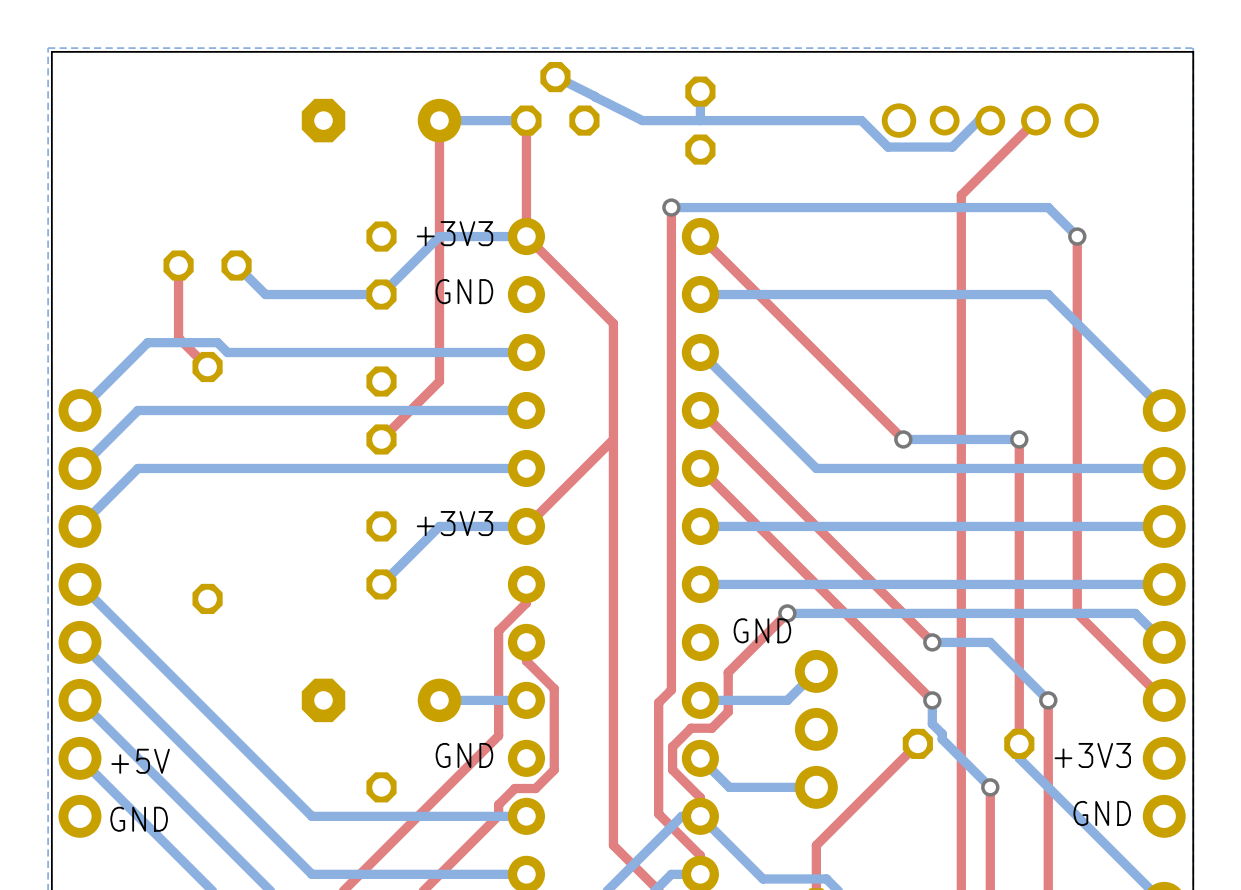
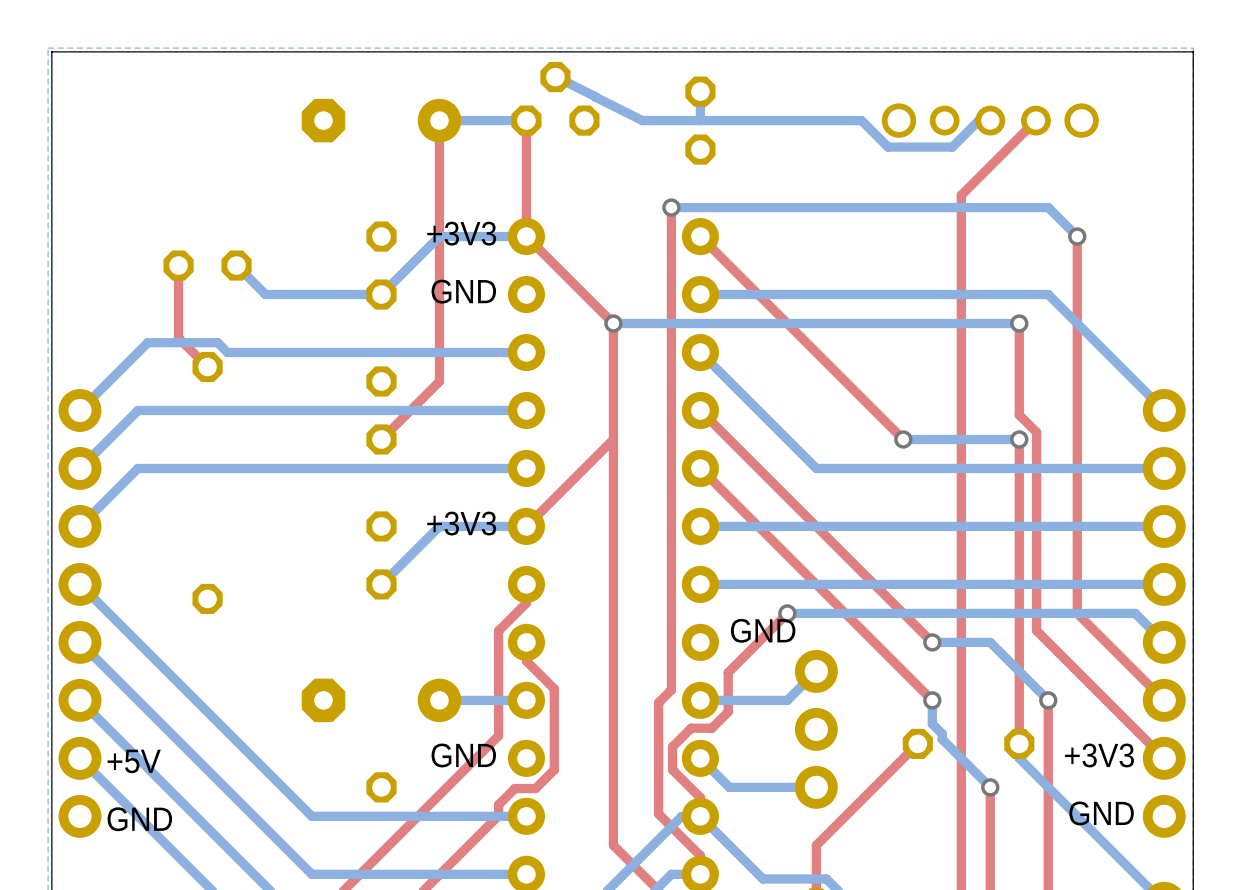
via: none -> (613, 323)
top track: none -> (1019, 323) (1019, 415) (1036, 432) (1036, 630) (1164, 758)
bottom track: none -> (1019, 323) (613, 323)
via: none -> (1019, 323)

